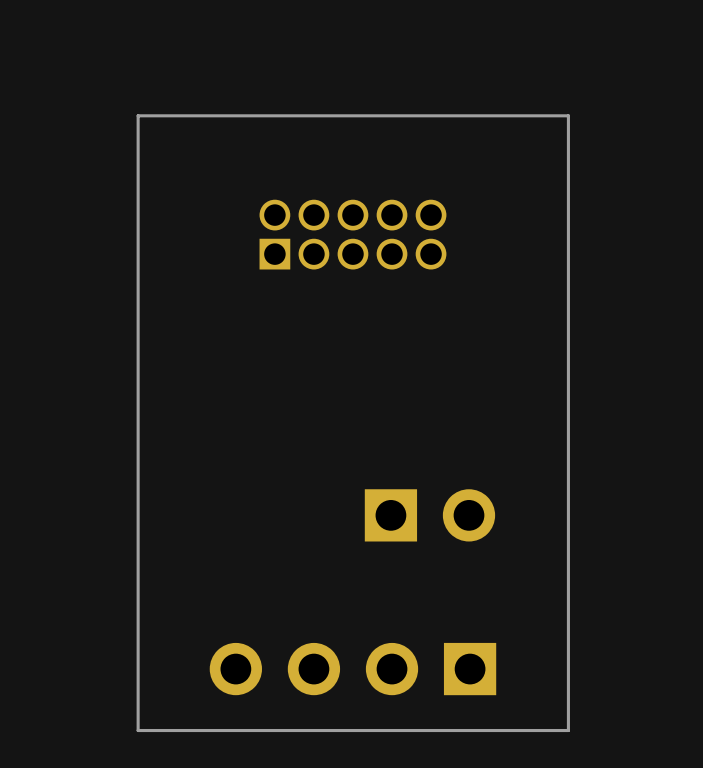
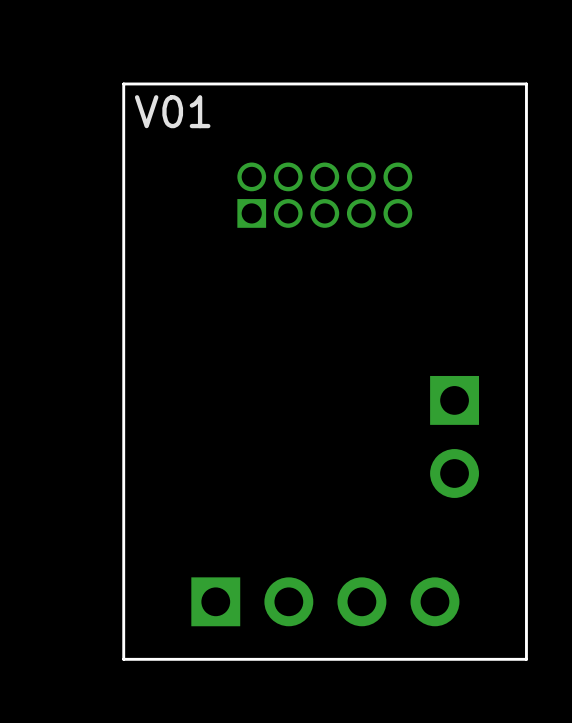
text: none -> V01 (172, 111)
part rotation: 0° (429, 515) -> 90° clockwise (454, 436)
part rotation: 0° (352, 669) -> 180° (325, 601)

